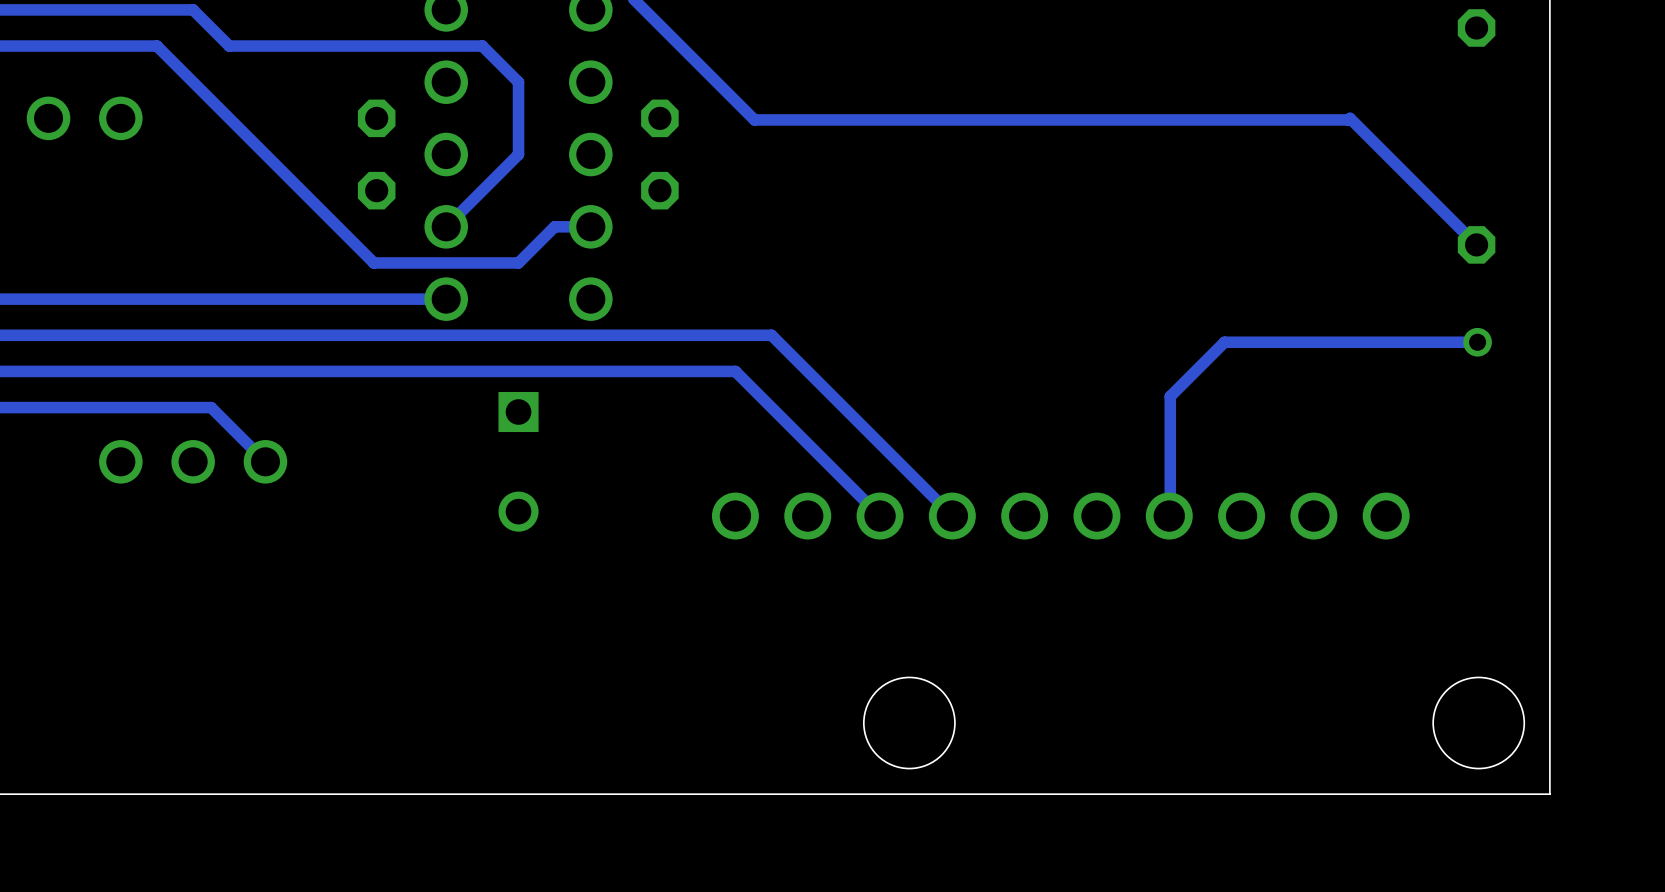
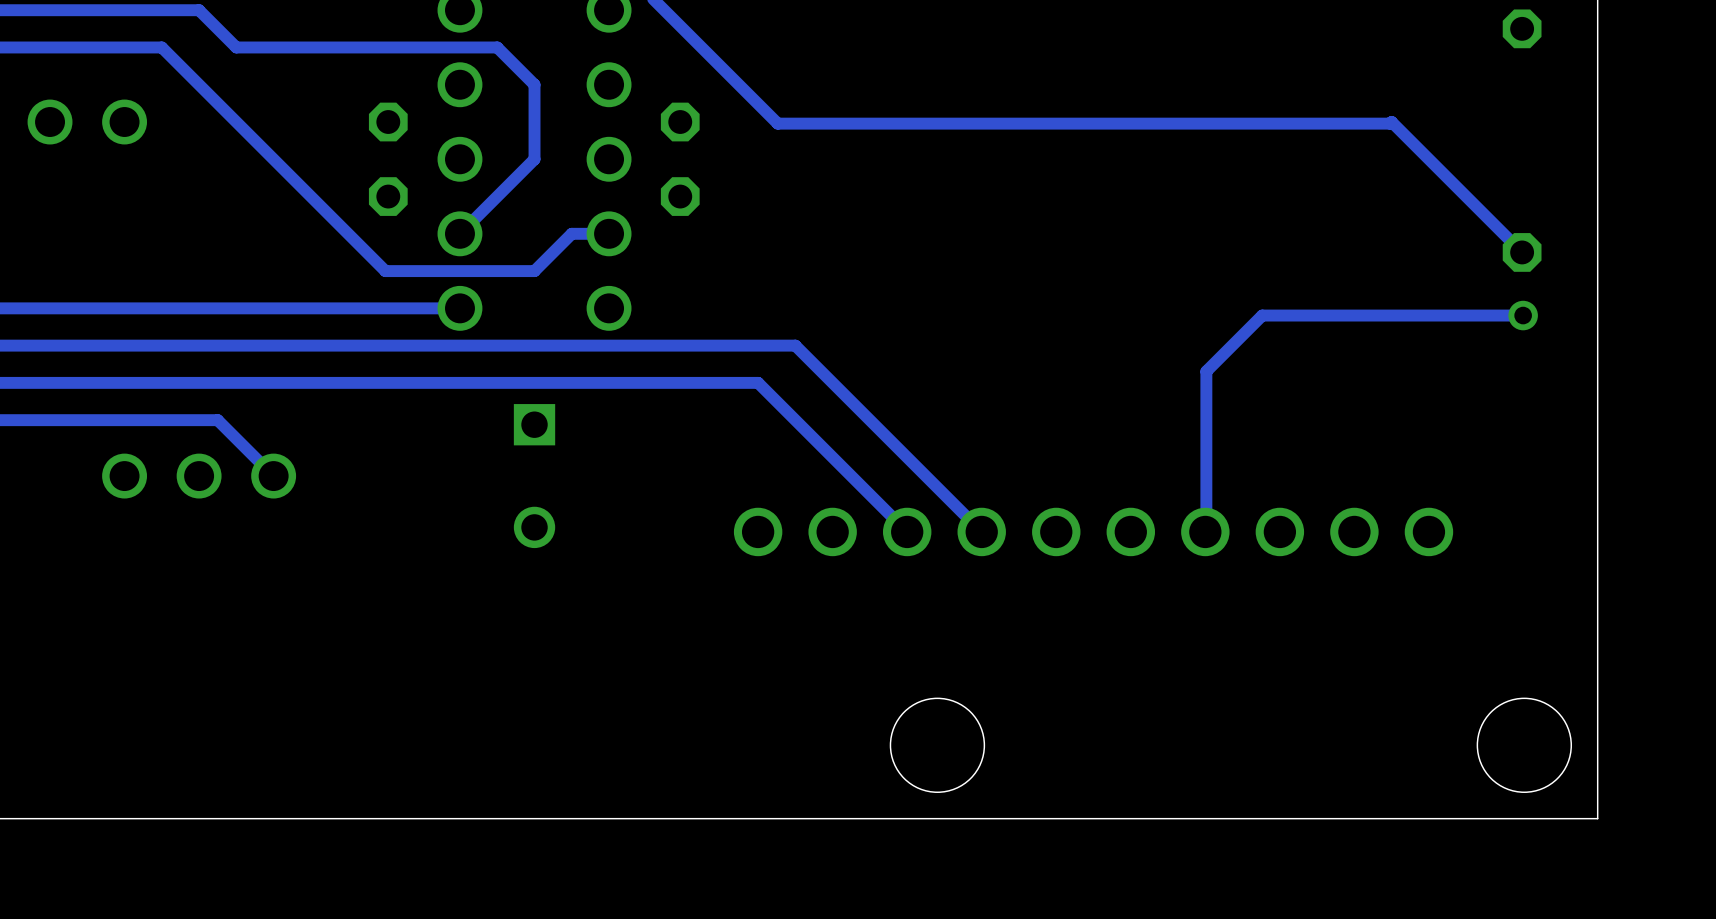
track: (1477, 342) (1224, 342) (1170, 396) -> (1523, 315) (1262, 315) (1206, 371) (1206, 408)
via position: (1477, 342) -> (1523, 315)

